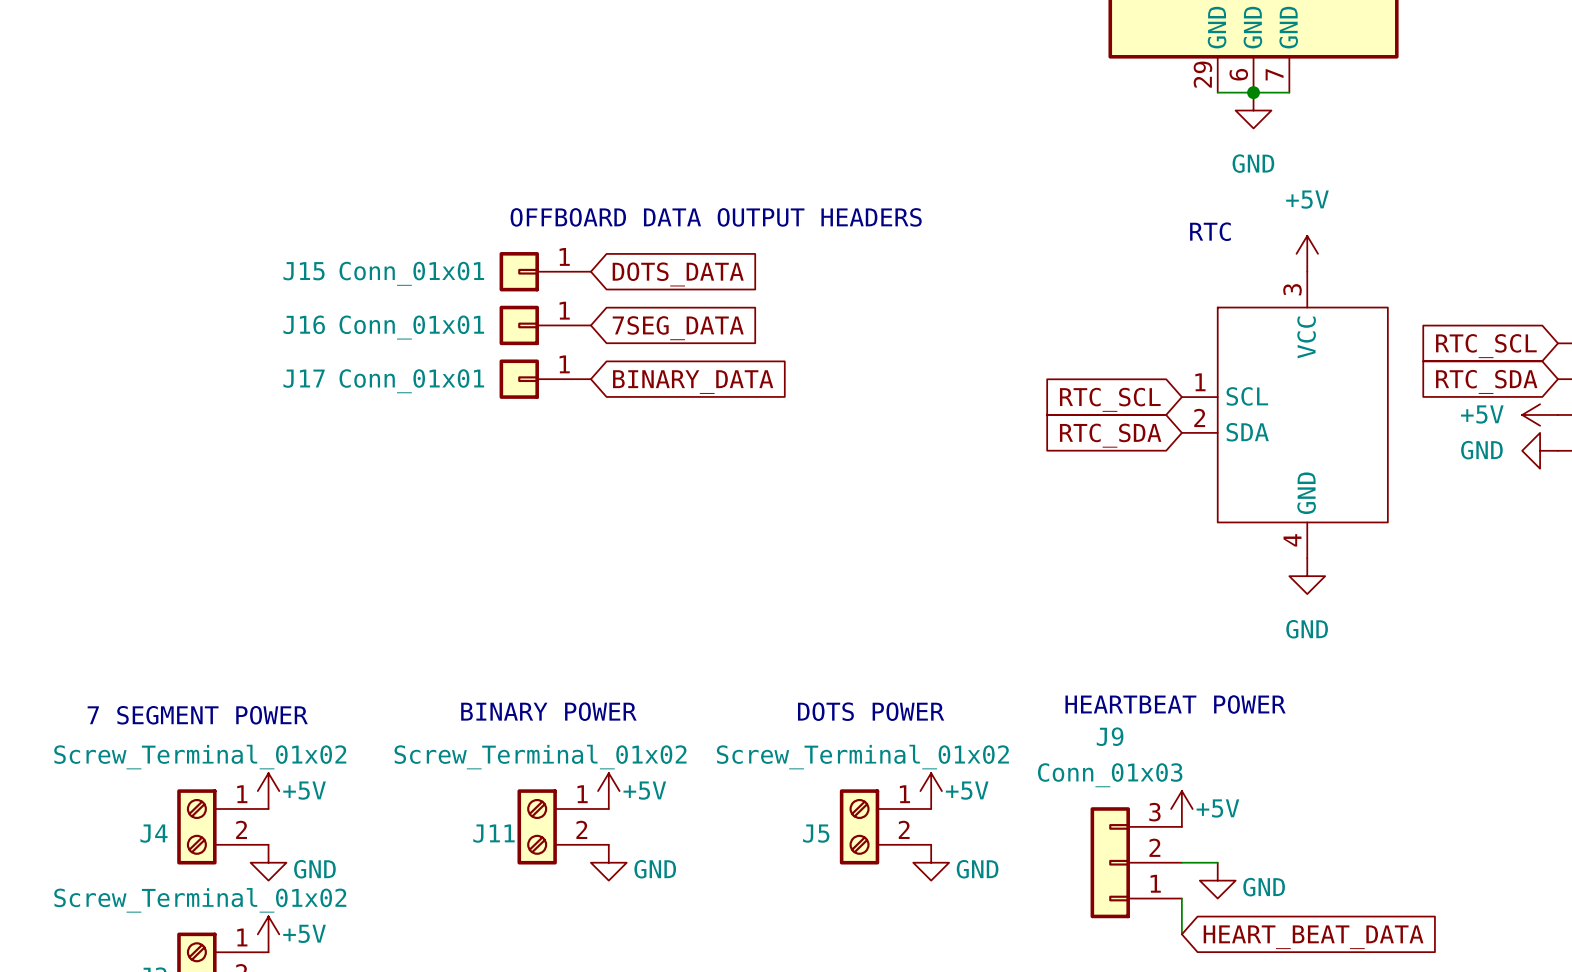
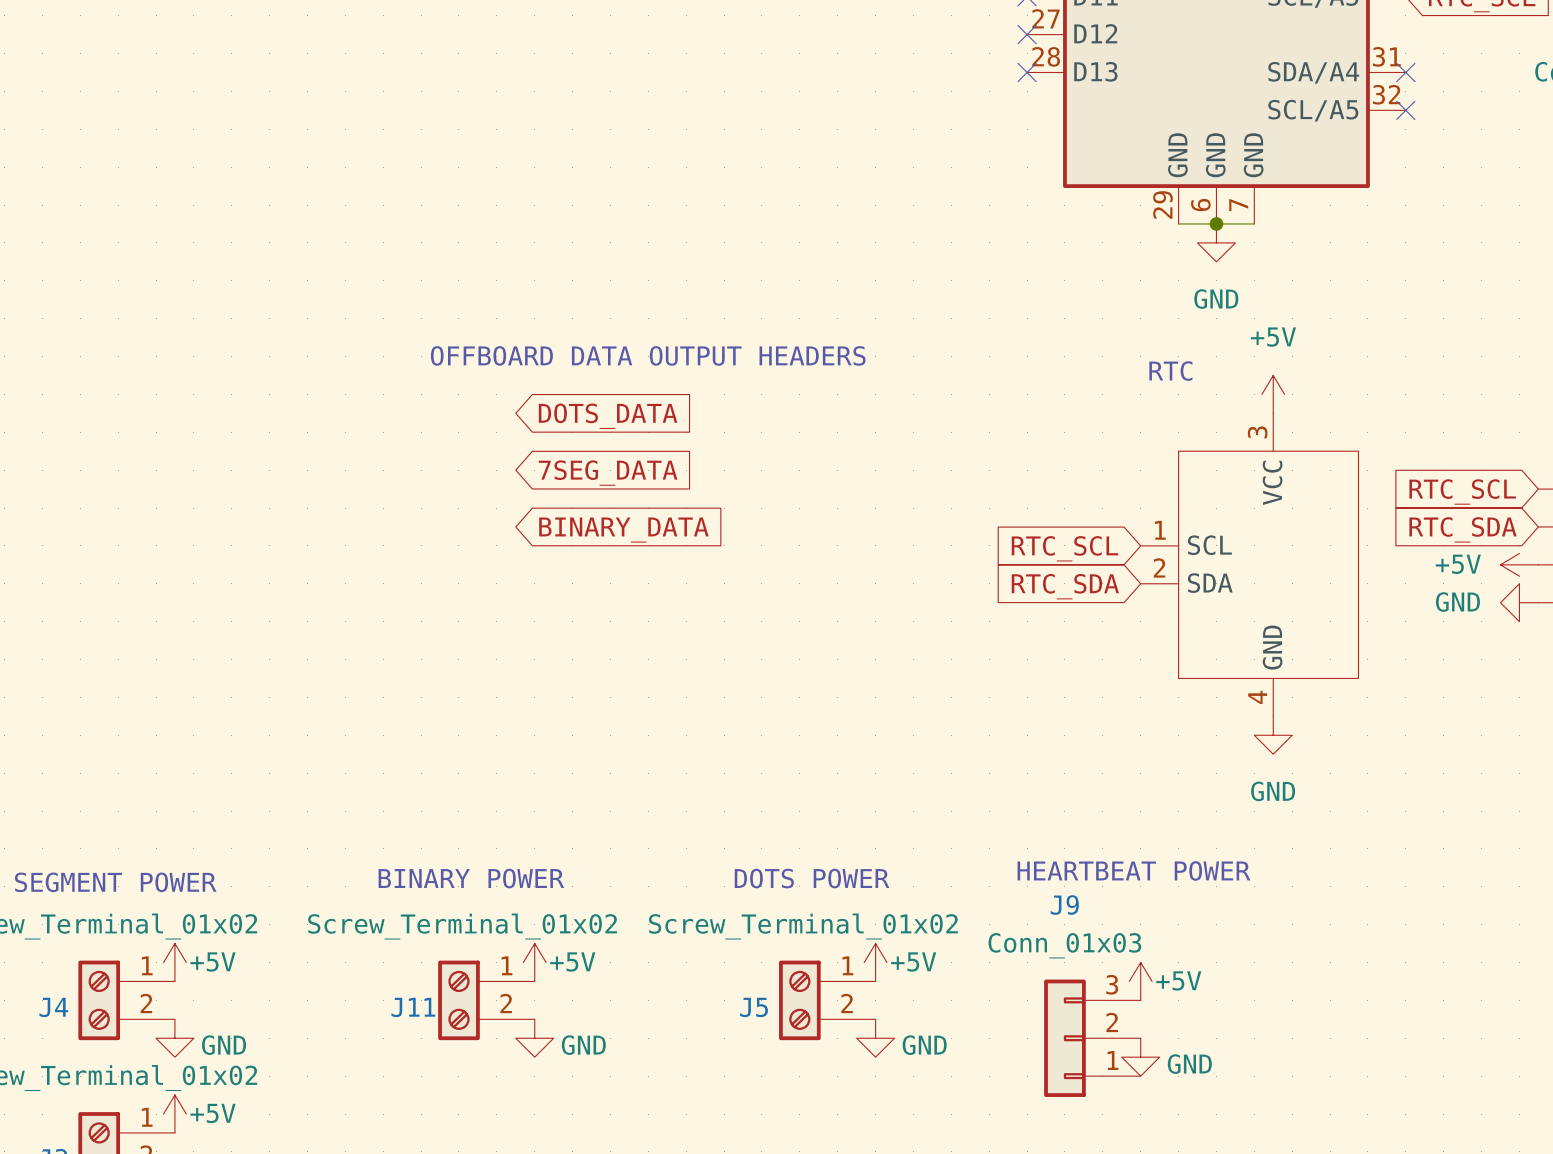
J15: Conn_01x01 (545, 271) -> none
J16: Conn_01x01 (545, 325) -> none
J17: Conn_01x01 (545, 379) -> none
wire: (1181, 862) (1217, 862) -> none
power symbol position: GND (1217, 880) -> GND (1140, 1057)
wire: (1181, 898) (1181, 934) -> none
global label: HEART_BEAT_DATA (1313, 937) -> none

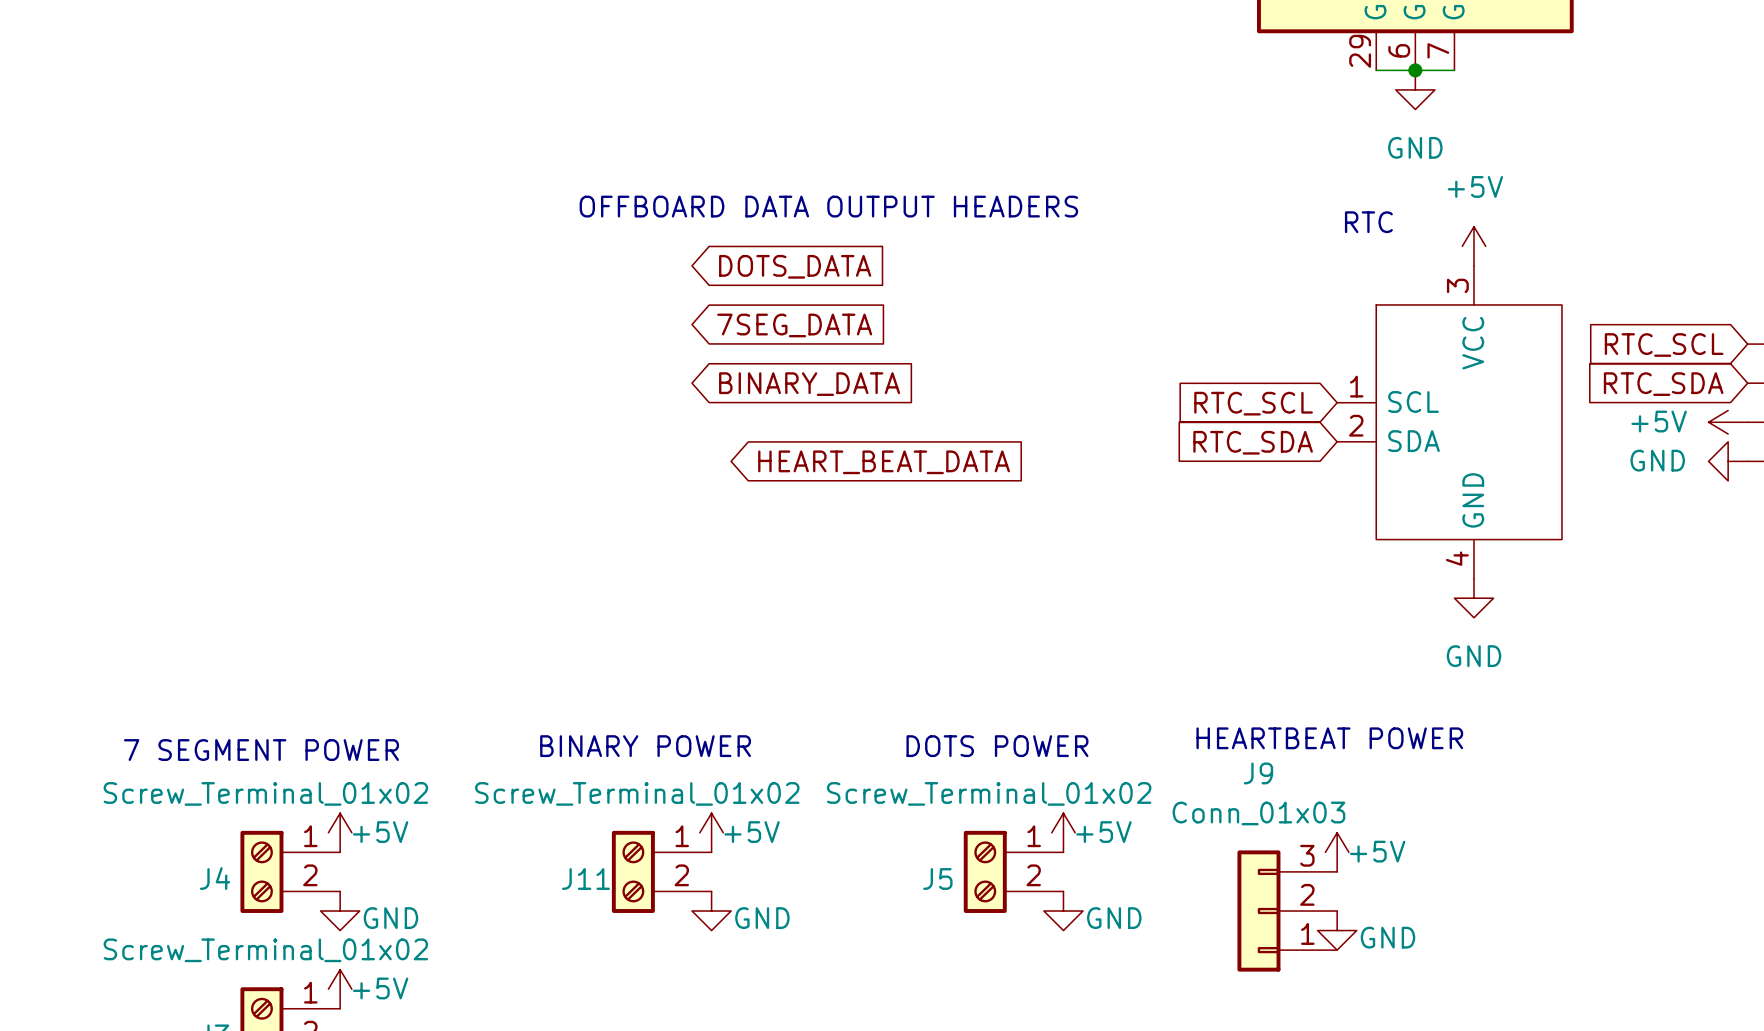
global label: none -> HEART_BEAT_DATA (884, 462)

